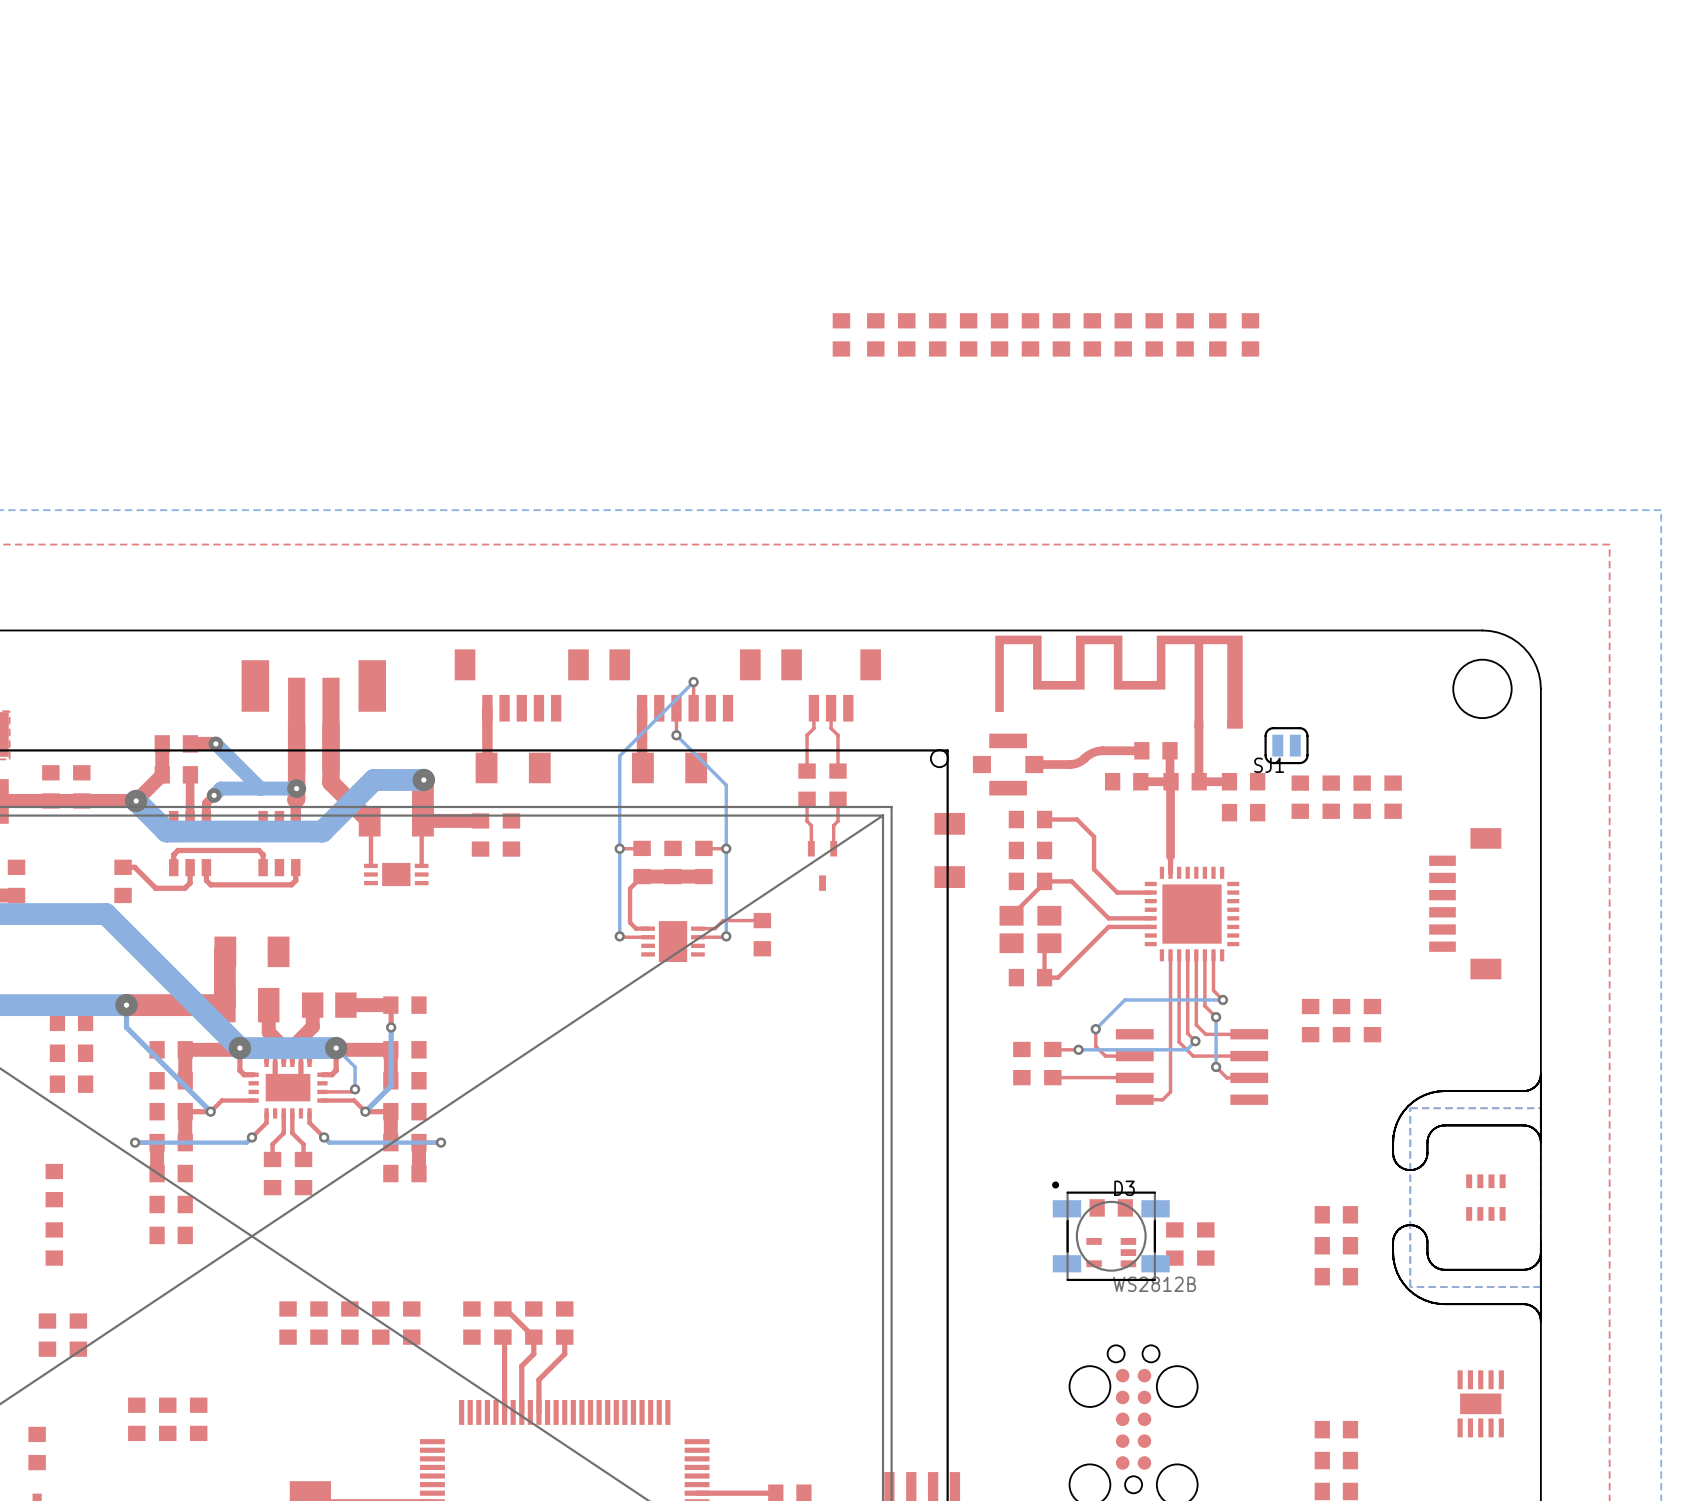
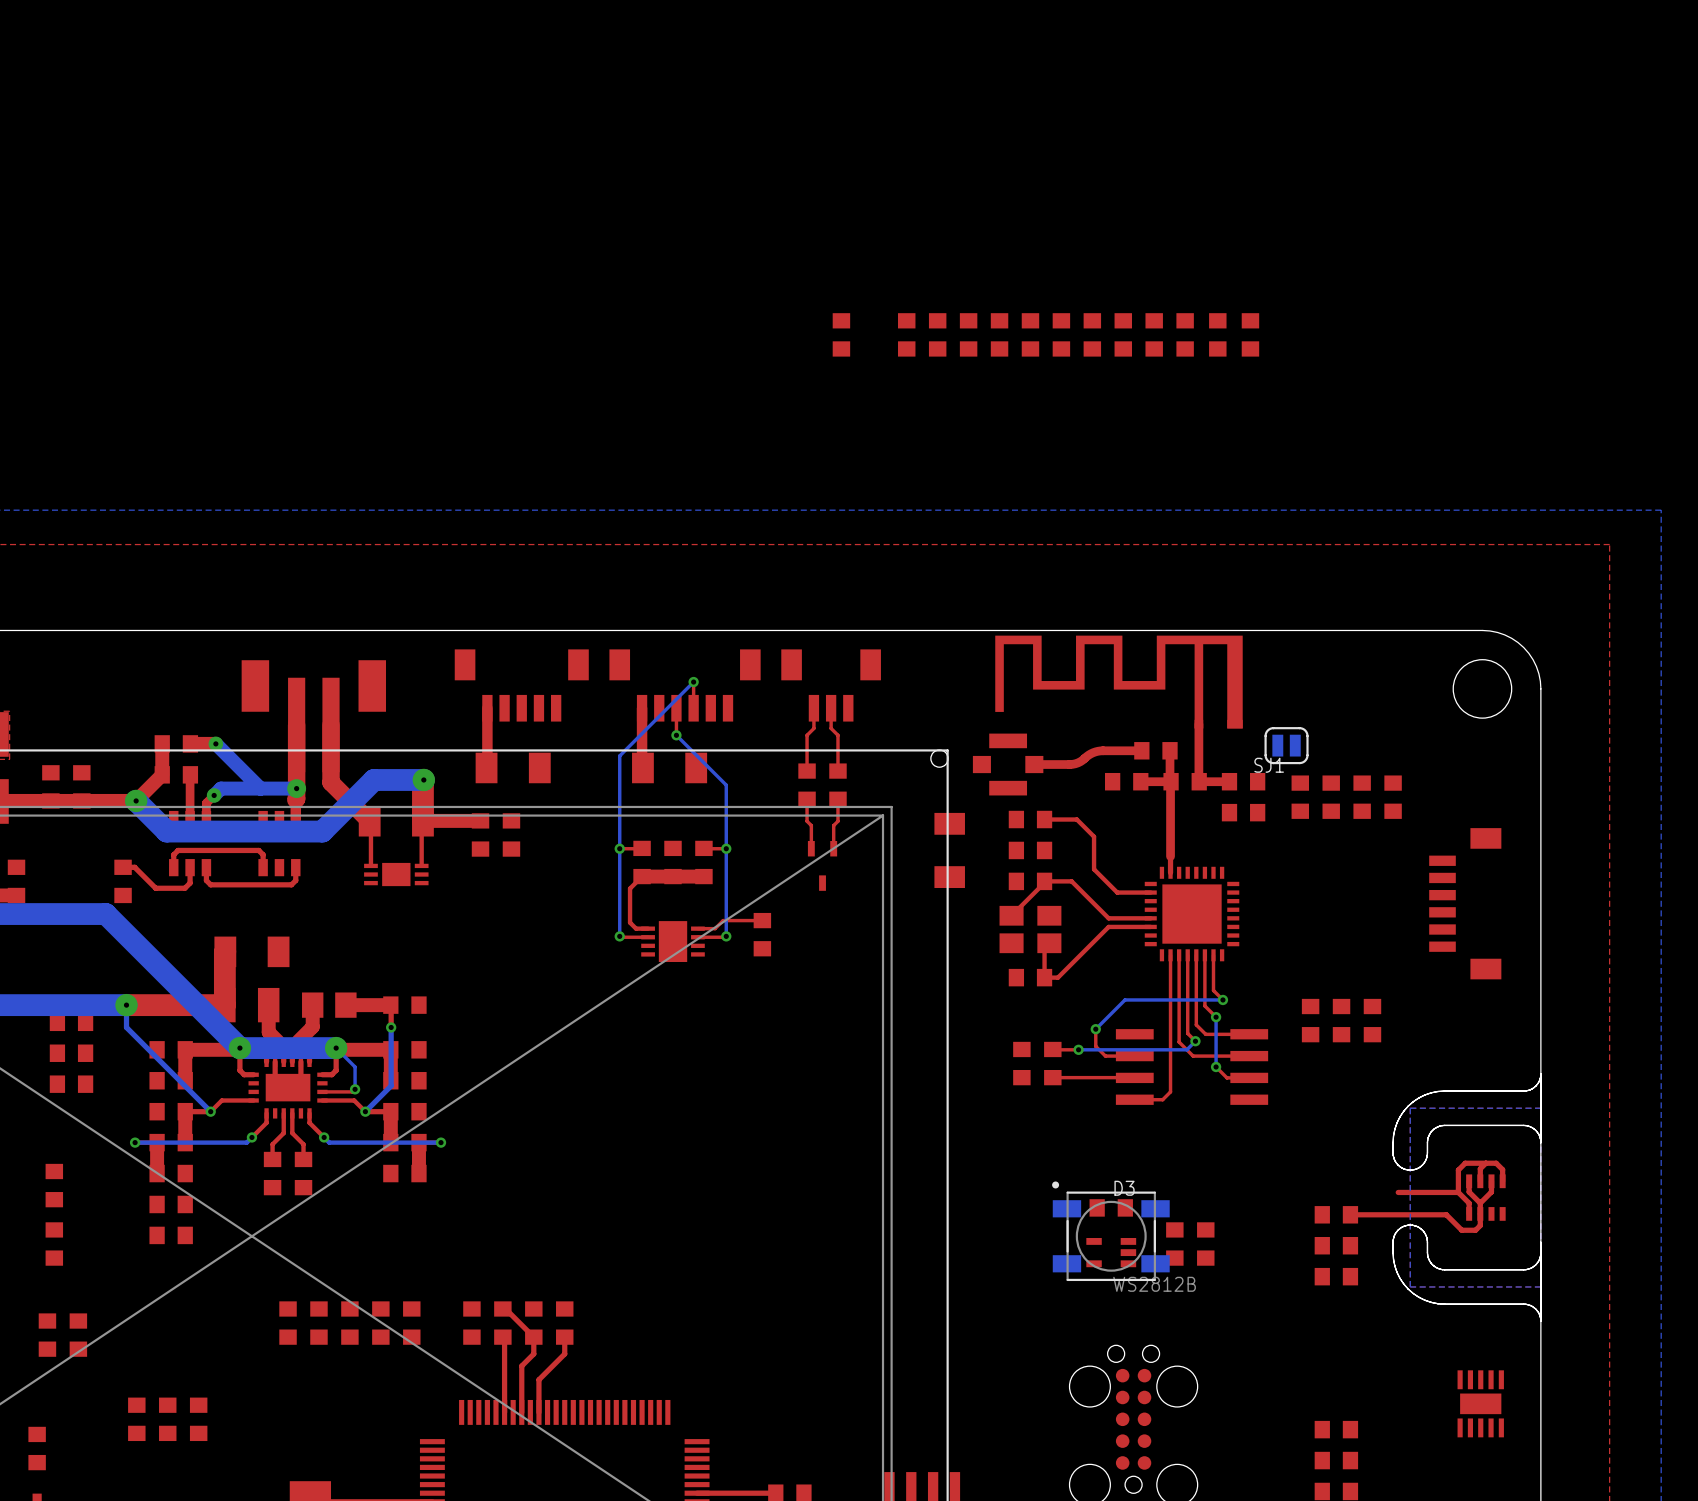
part: (875, 334) -> none
top track: none -> (1485, 1163) (1480, 1168) (1480, 1181)
top track: none -> (1469, 1181) (1469, 1192) (1480, 1203)
top track: none -> (1491, 1181) (1491, 1192) (1480, 1203)
top track: none -> (1502, 1181) (1502, 1169) (1496, 1163) (1465, 1163) (1458, 1170) (1458, 1192)
top track: none -> (1458, 1192) (1469, 1203) (1469, 1213)
top track: none -> (1458, 1192) (1398, 1192)
top track: none -> (1480, 1203) (1480, 1225) (1475, 1230) (1461, 1230) (1446, 1214) (1350, 1214)

